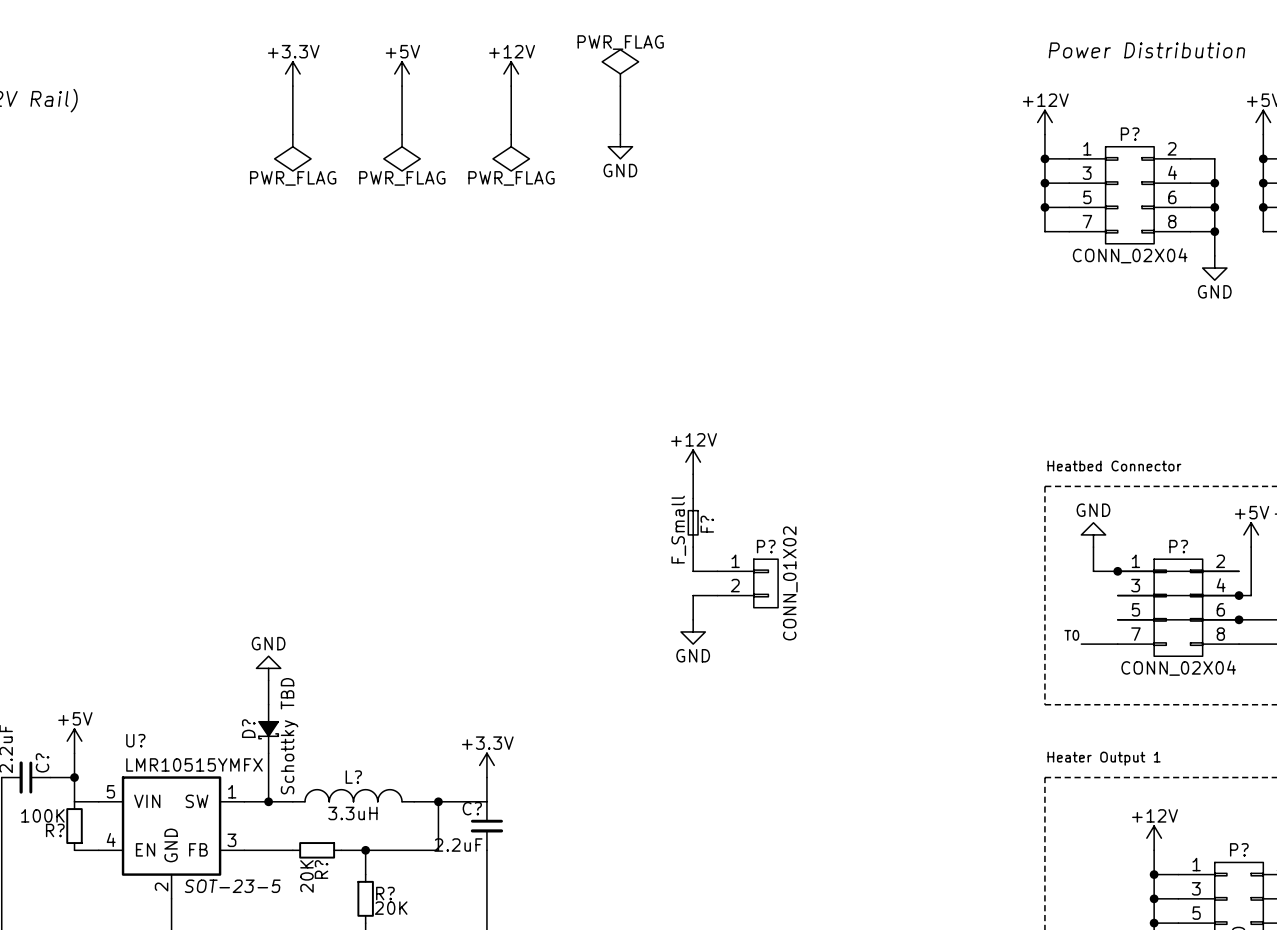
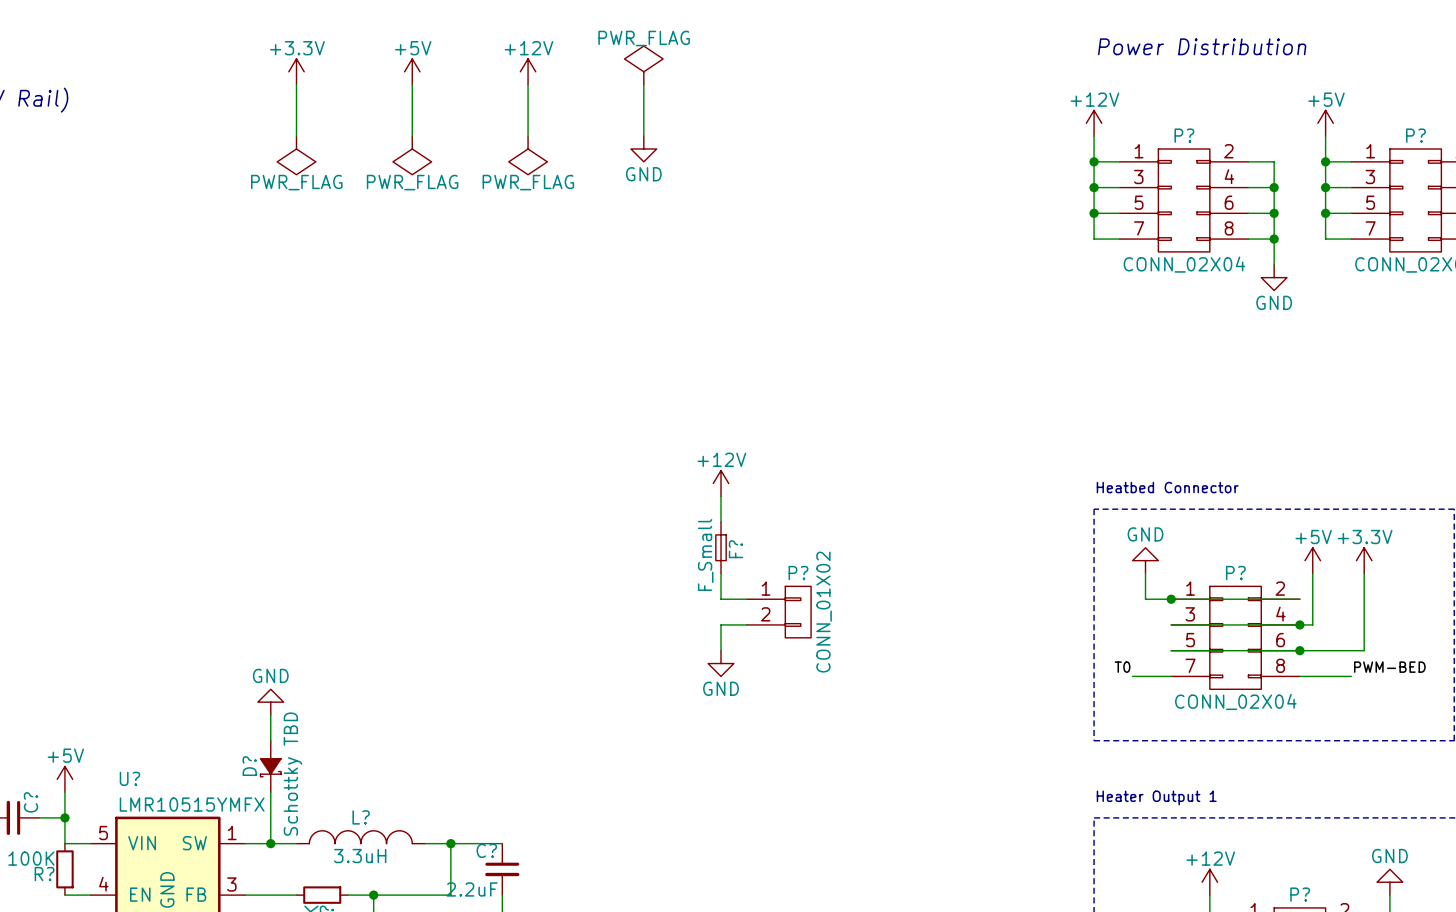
power symbol: +3.3V (486, 765) -> none
wire: (486, 777) (486, 801) -> none

